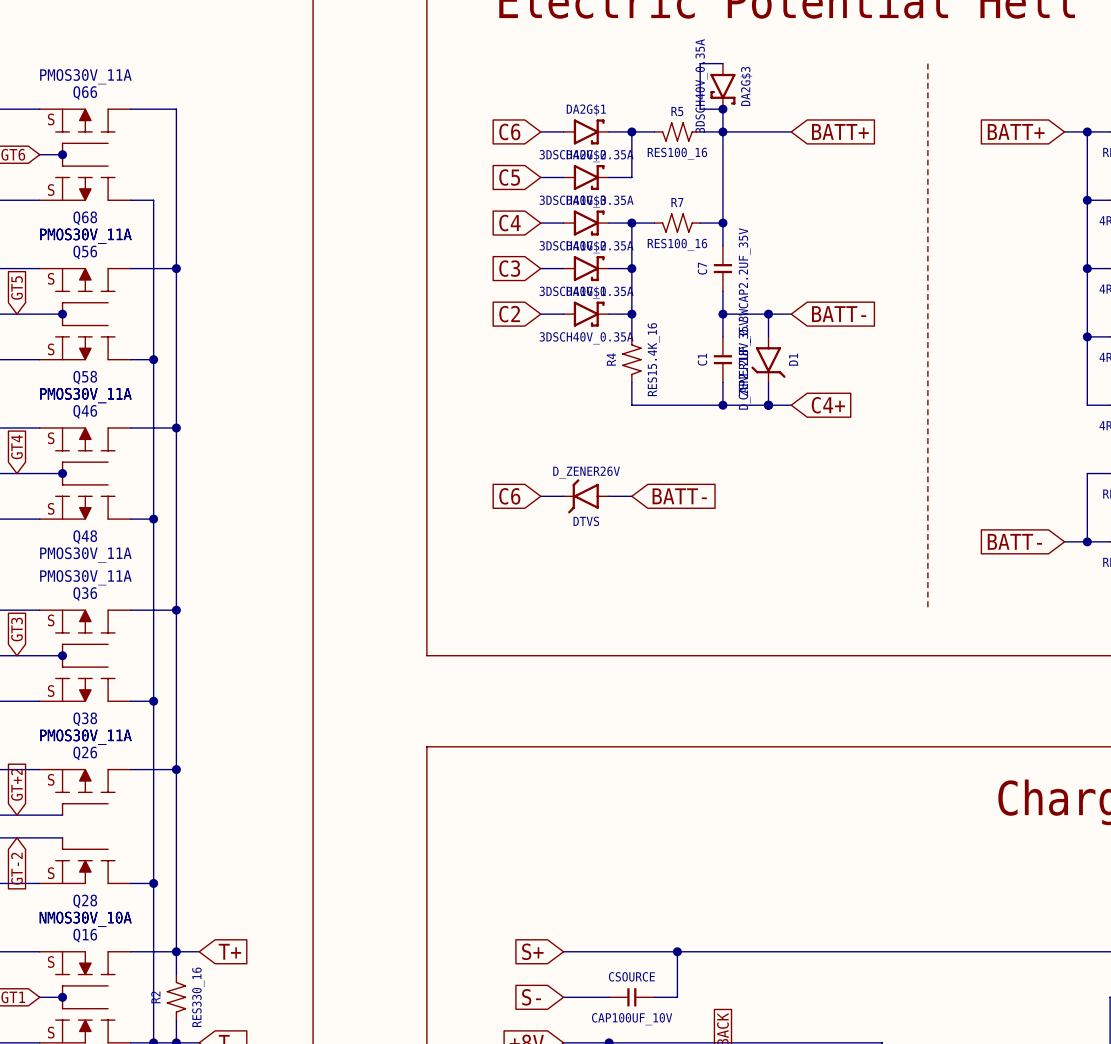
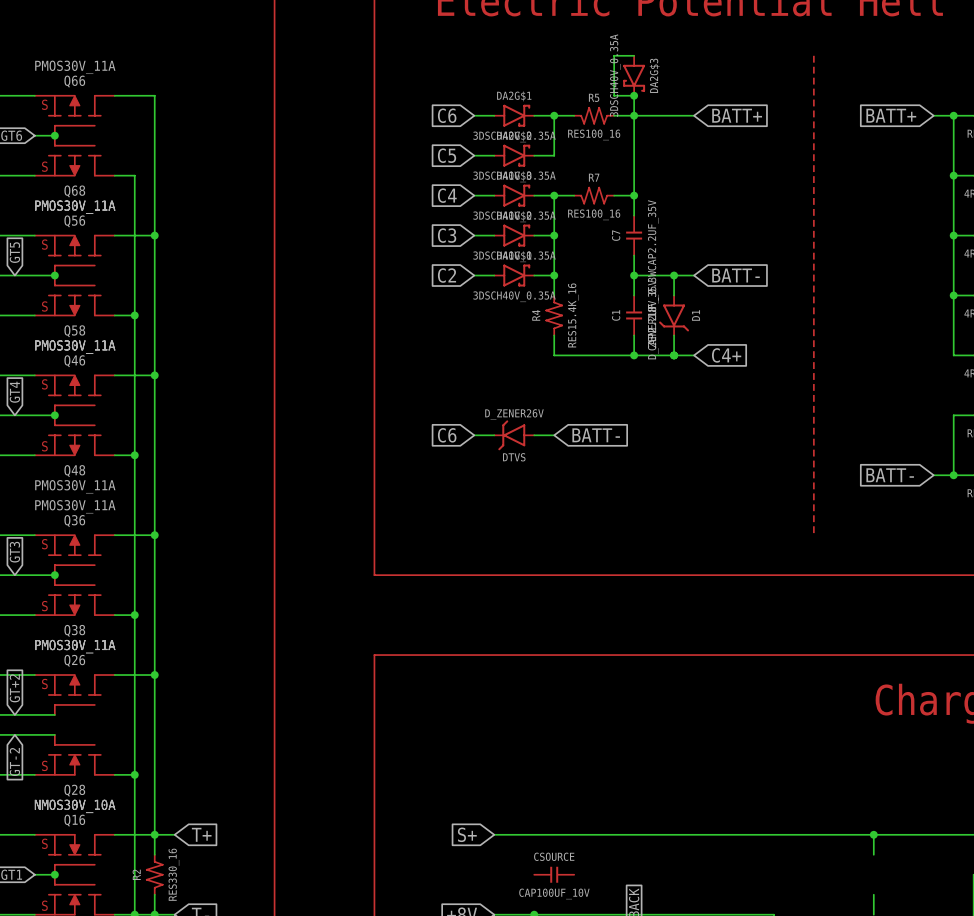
wire: (677, 951) (677, 997) (654, 997) -> none
junction: (677, 951) -> none
wire: none -> (873, 834) (873, 854)
junction: none -> (873, 834)
global label: S- (531, 997) -> none
wire: (563, 997) (609, 997) -> none
wire: none -> (873, 894) (873, 914)

